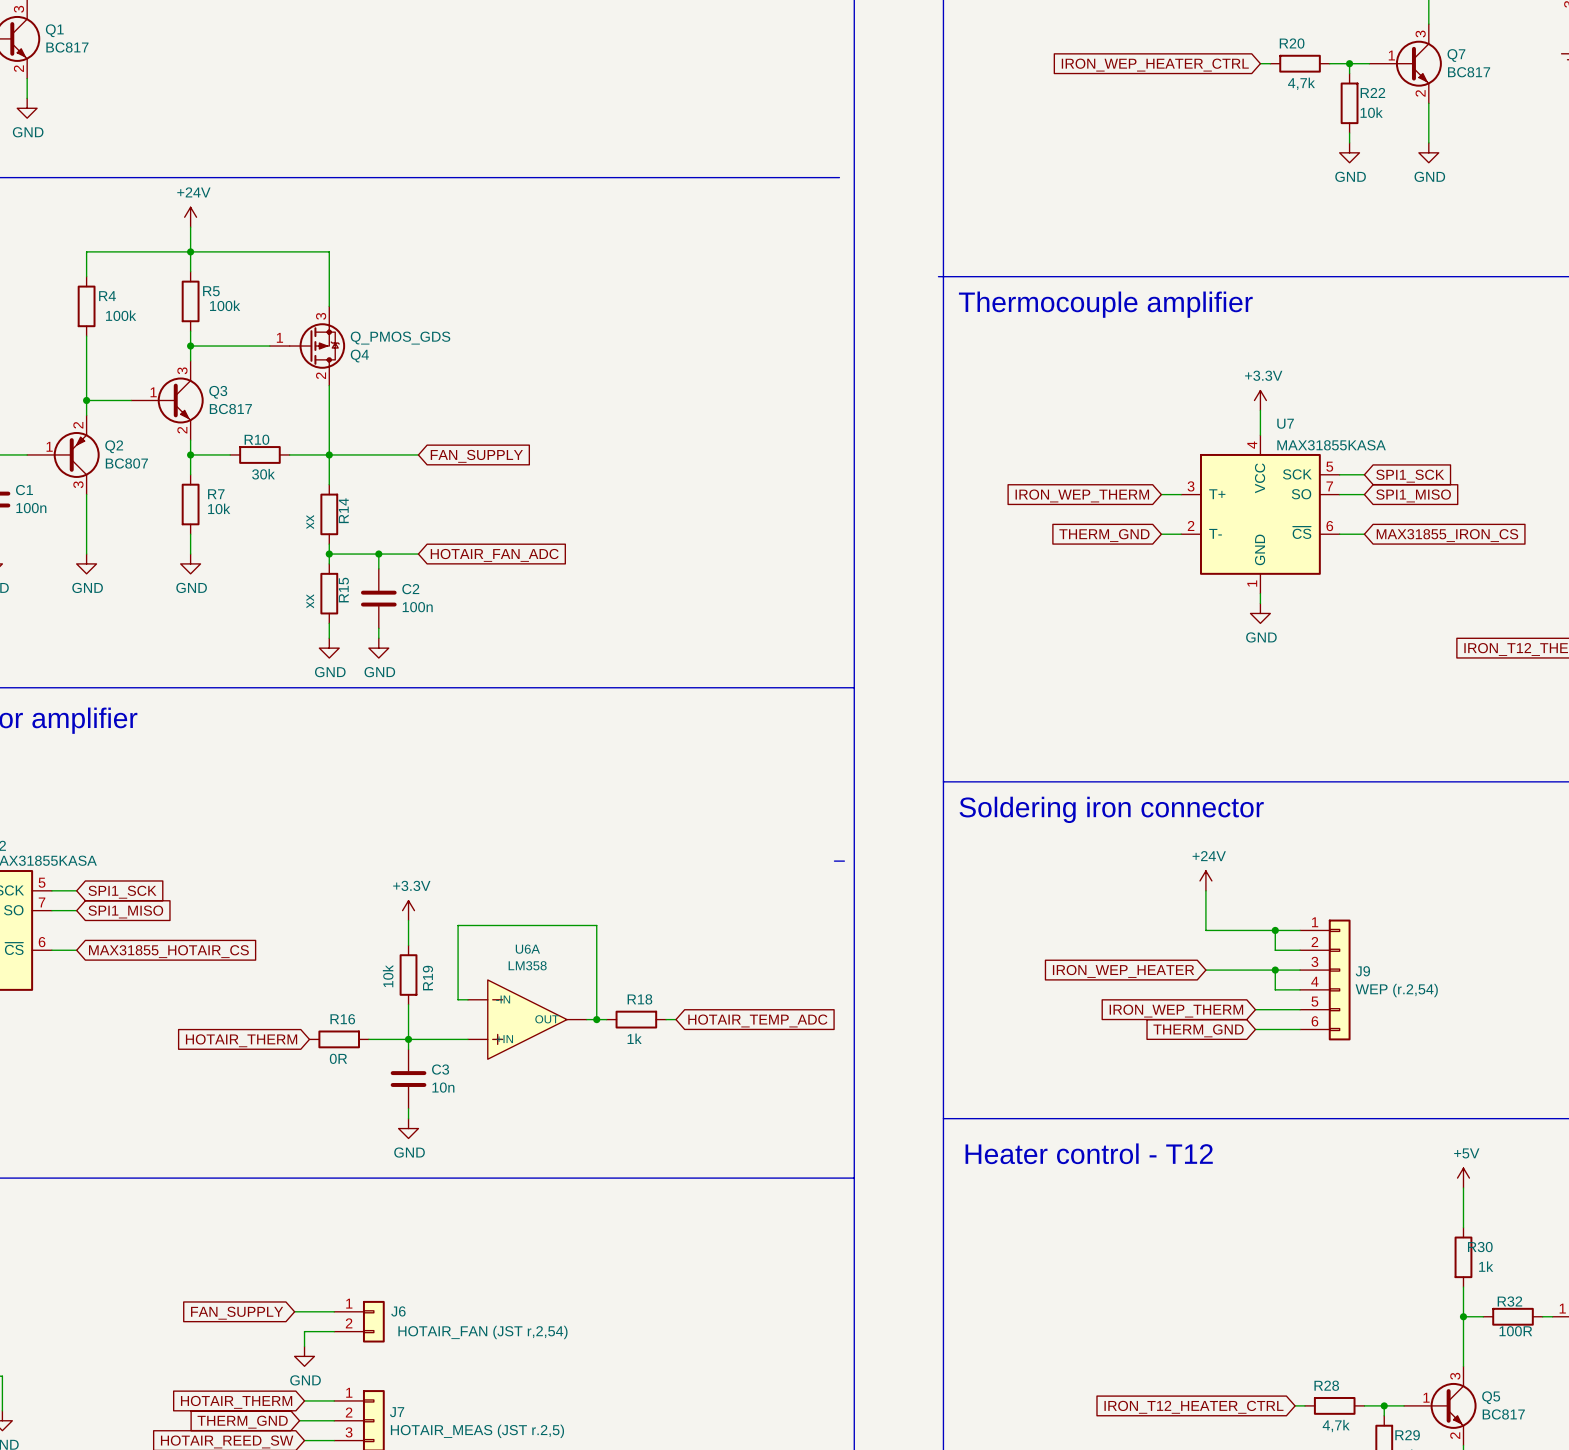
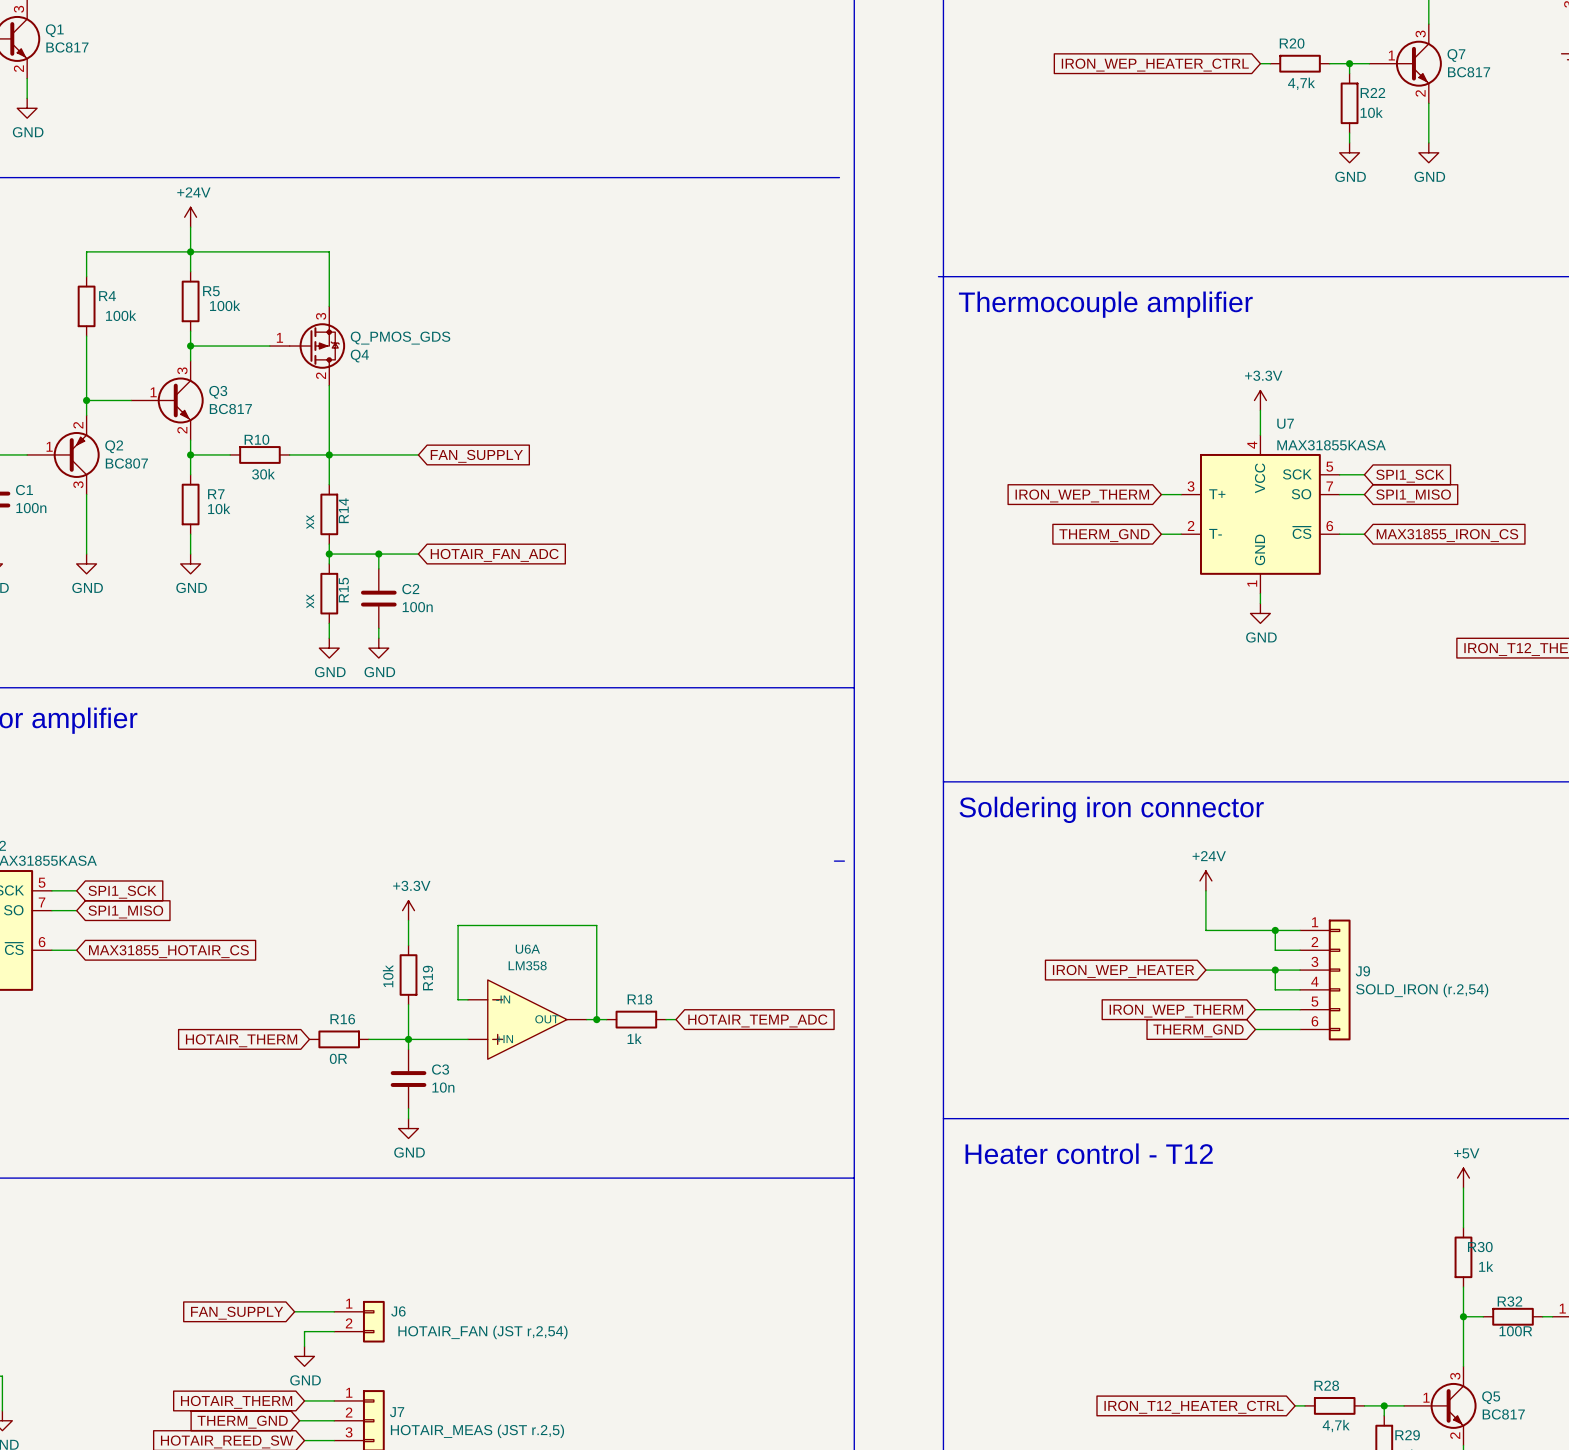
J9 value: WEP (r.2,54) (1396, 990) -> SOLD_IRON (r.2,54) (1422, 990)

